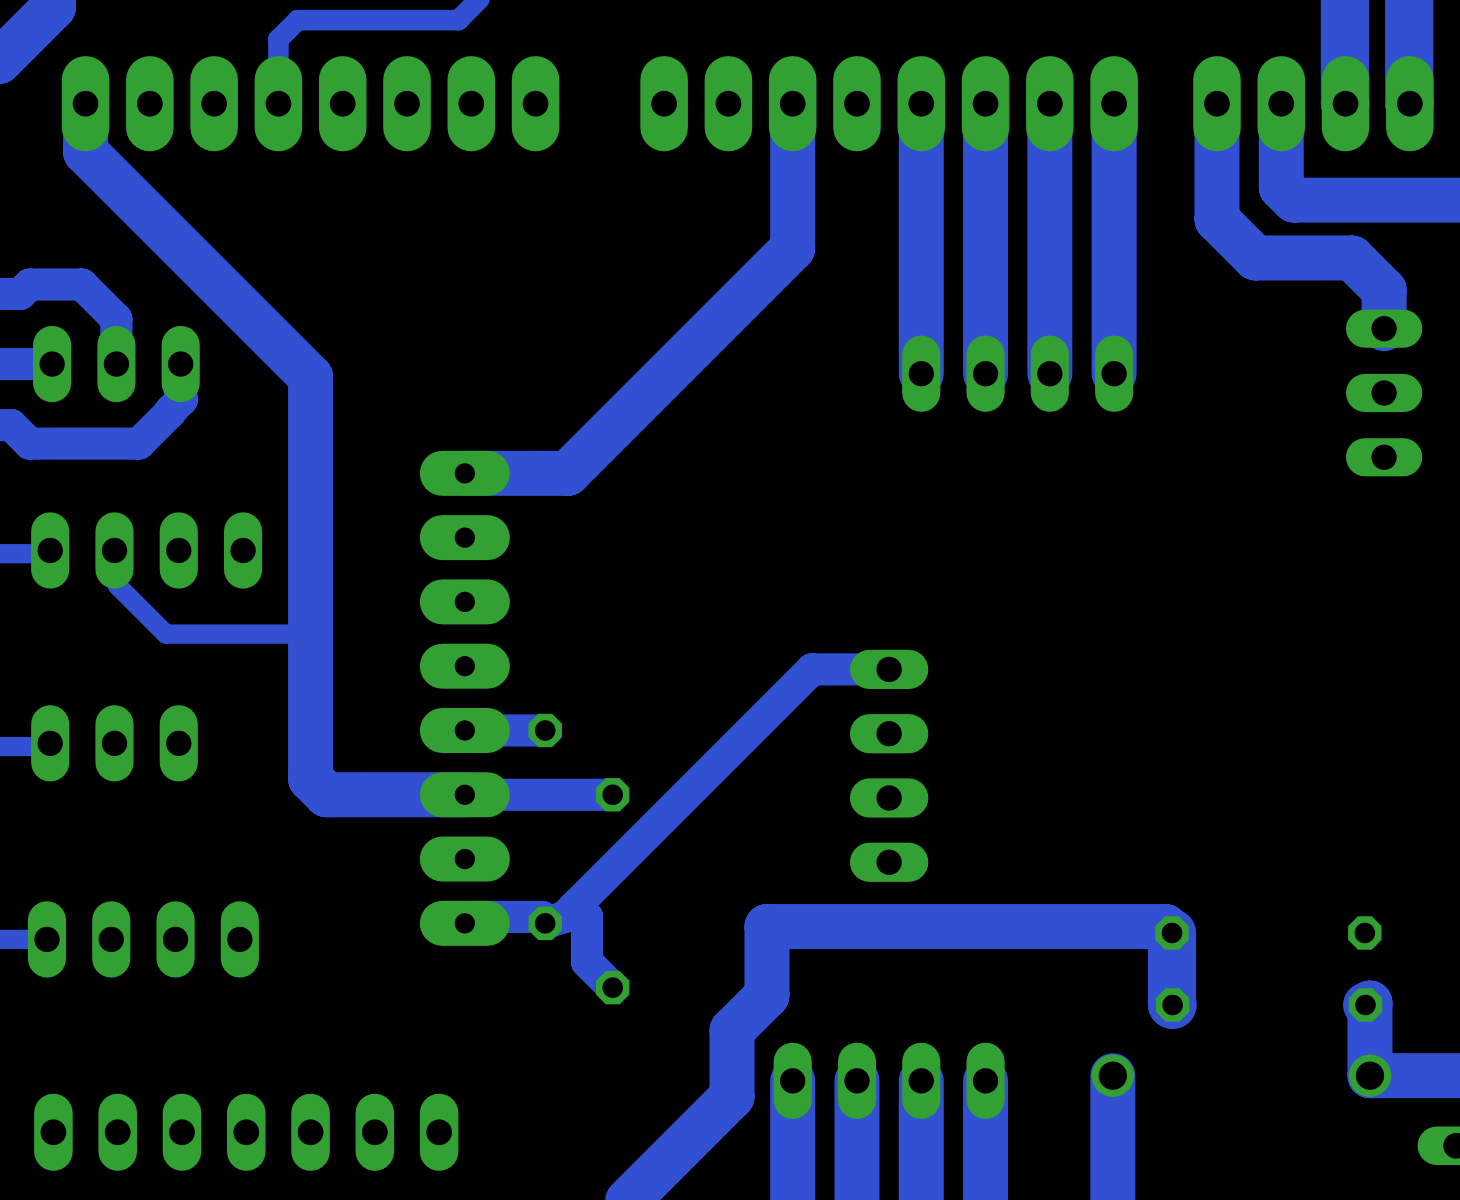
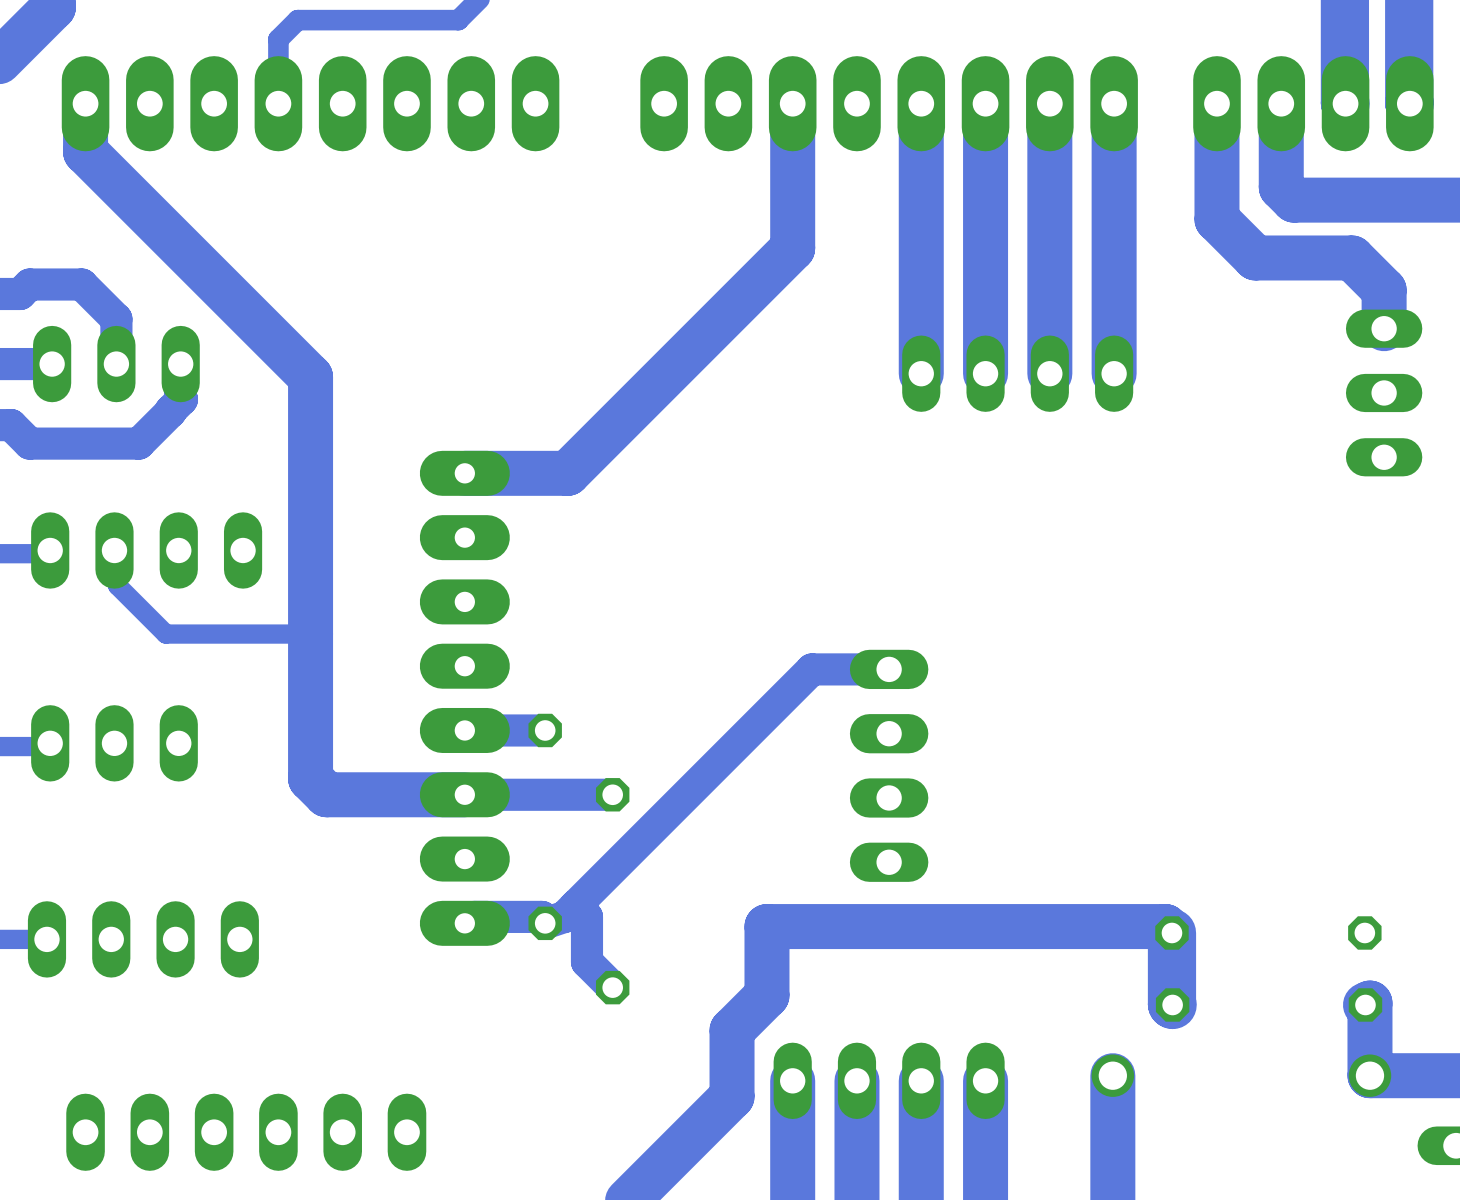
part footprint: [34, 1093, 459, 1171] -> [66, 1093, 427, 1171]

